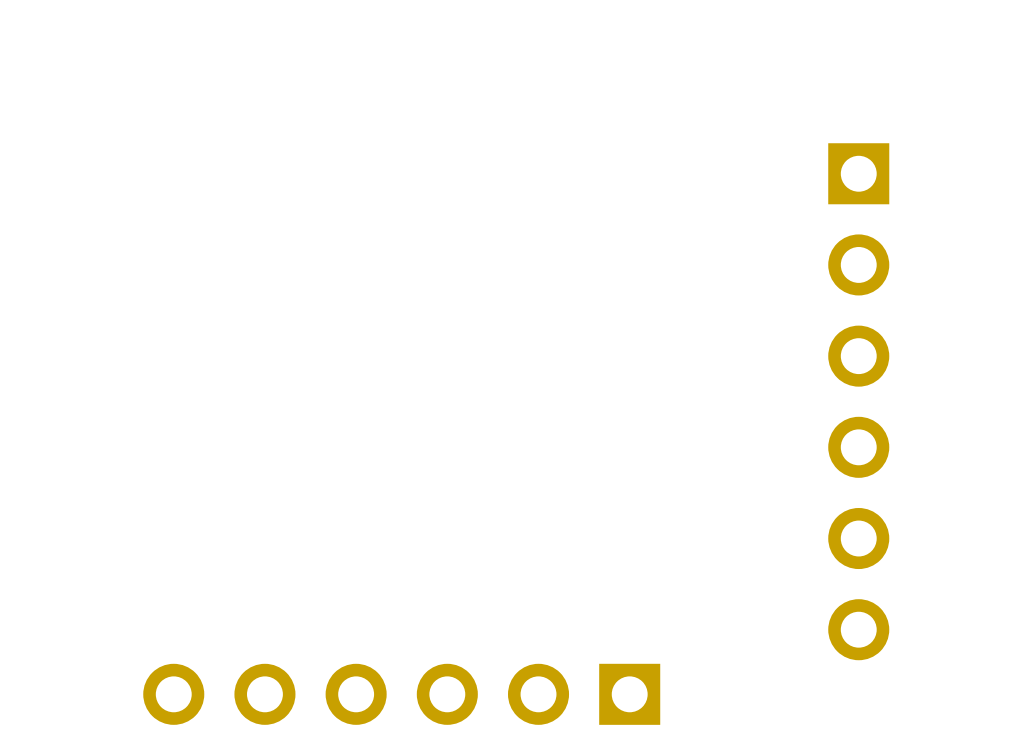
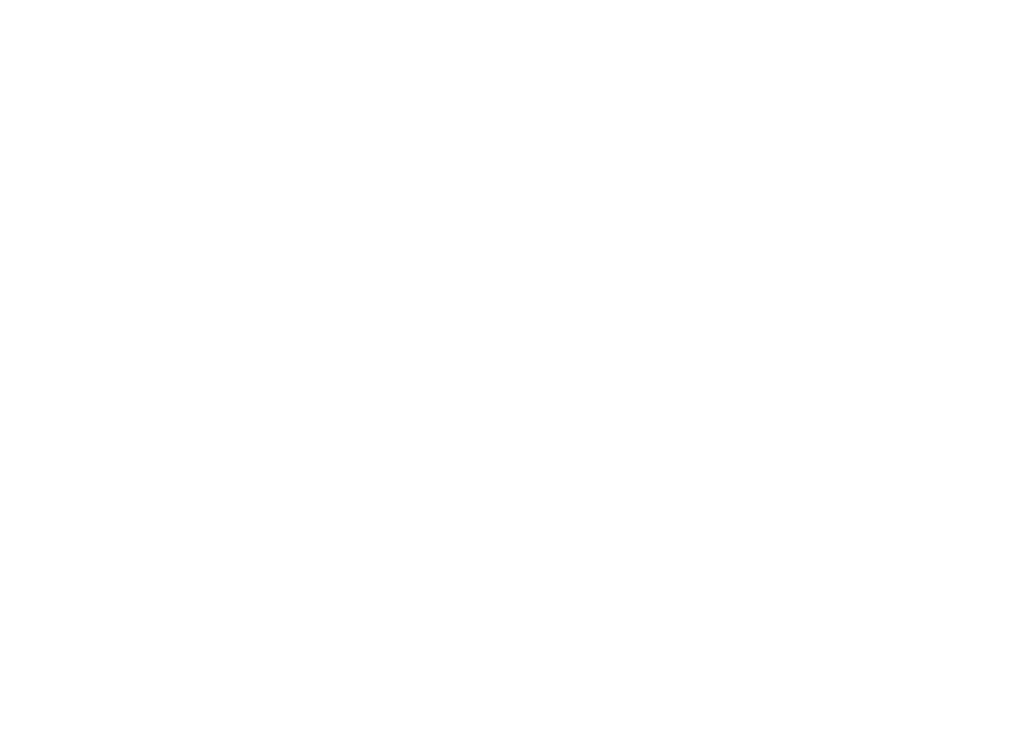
part: (858, 401) -> none
part: (401, 694) -> none

